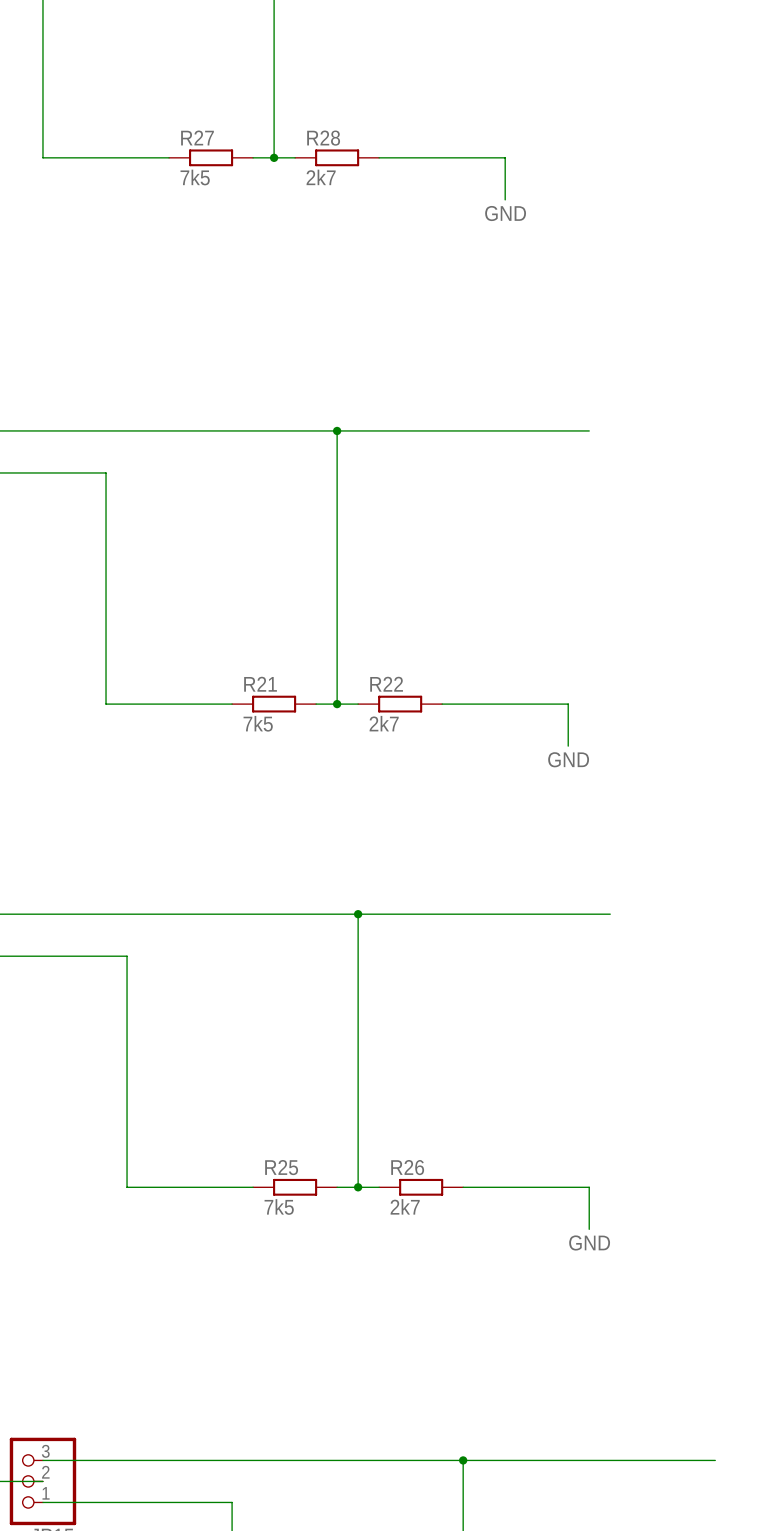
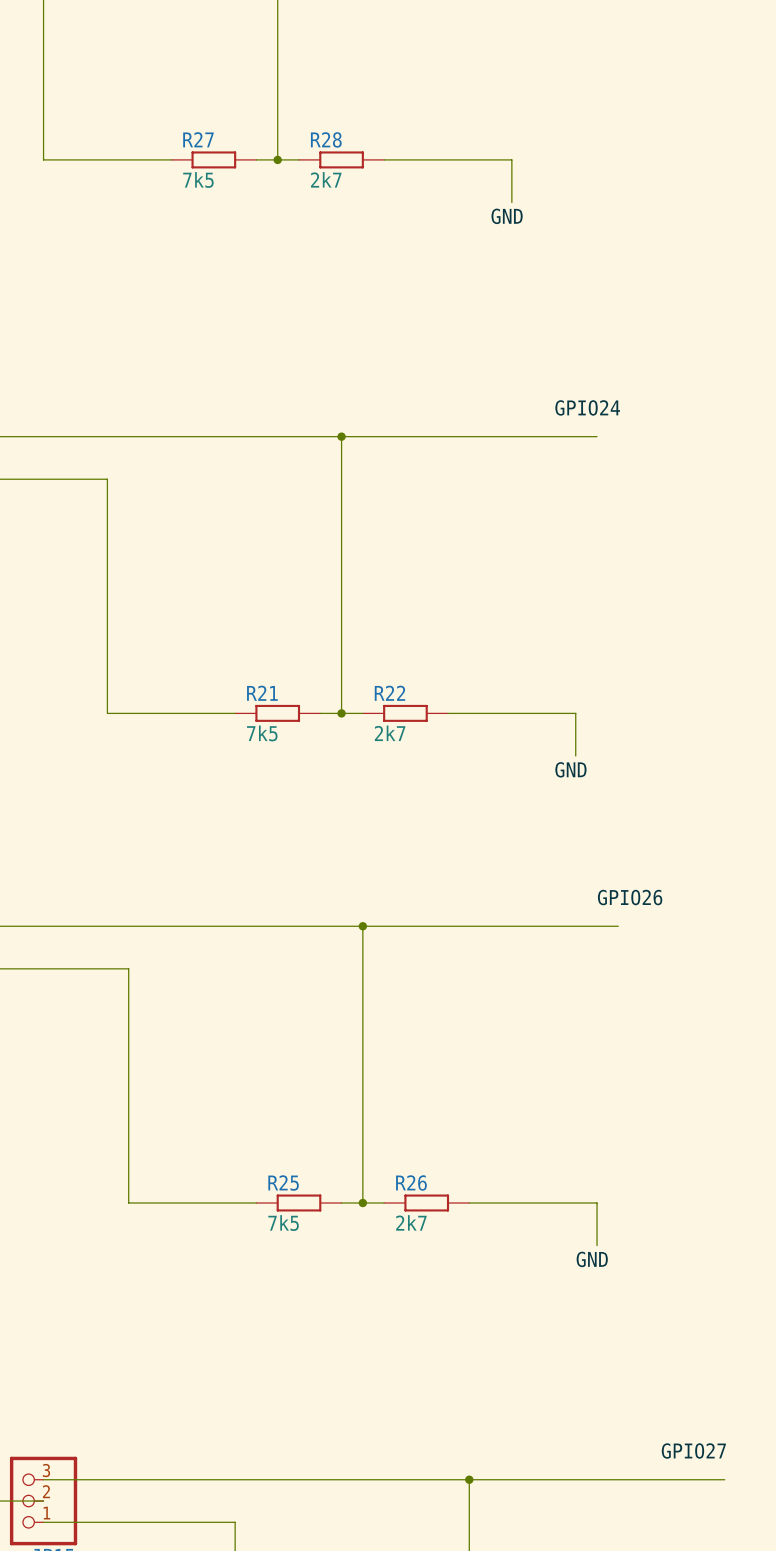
label: none -> GPIO24 (587, 407)
label: none -> GPIO26 (630, 897)
label: none -> GPIO27 (693, 1451)

